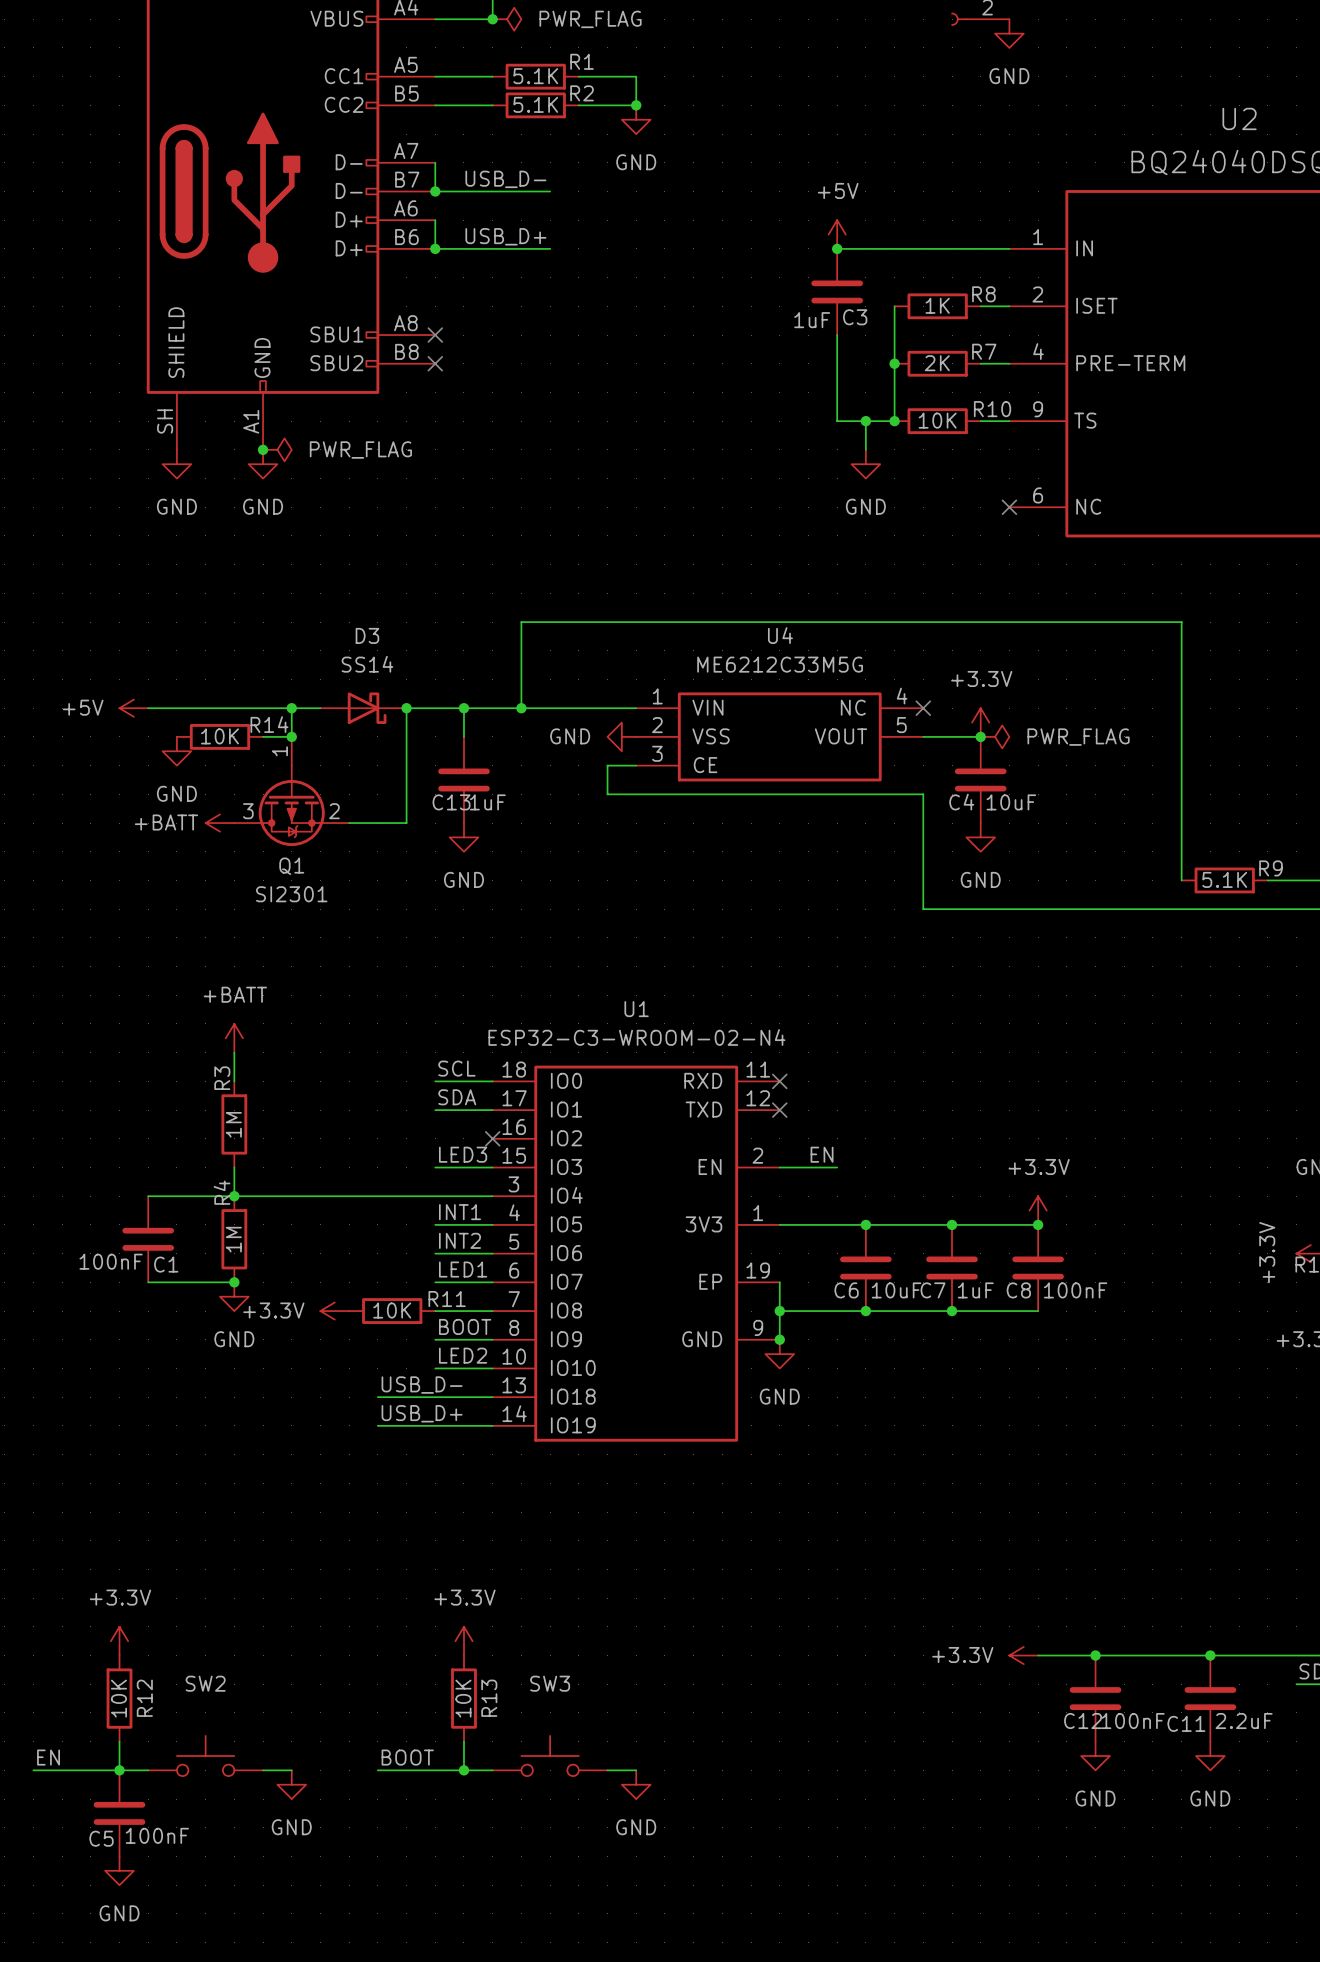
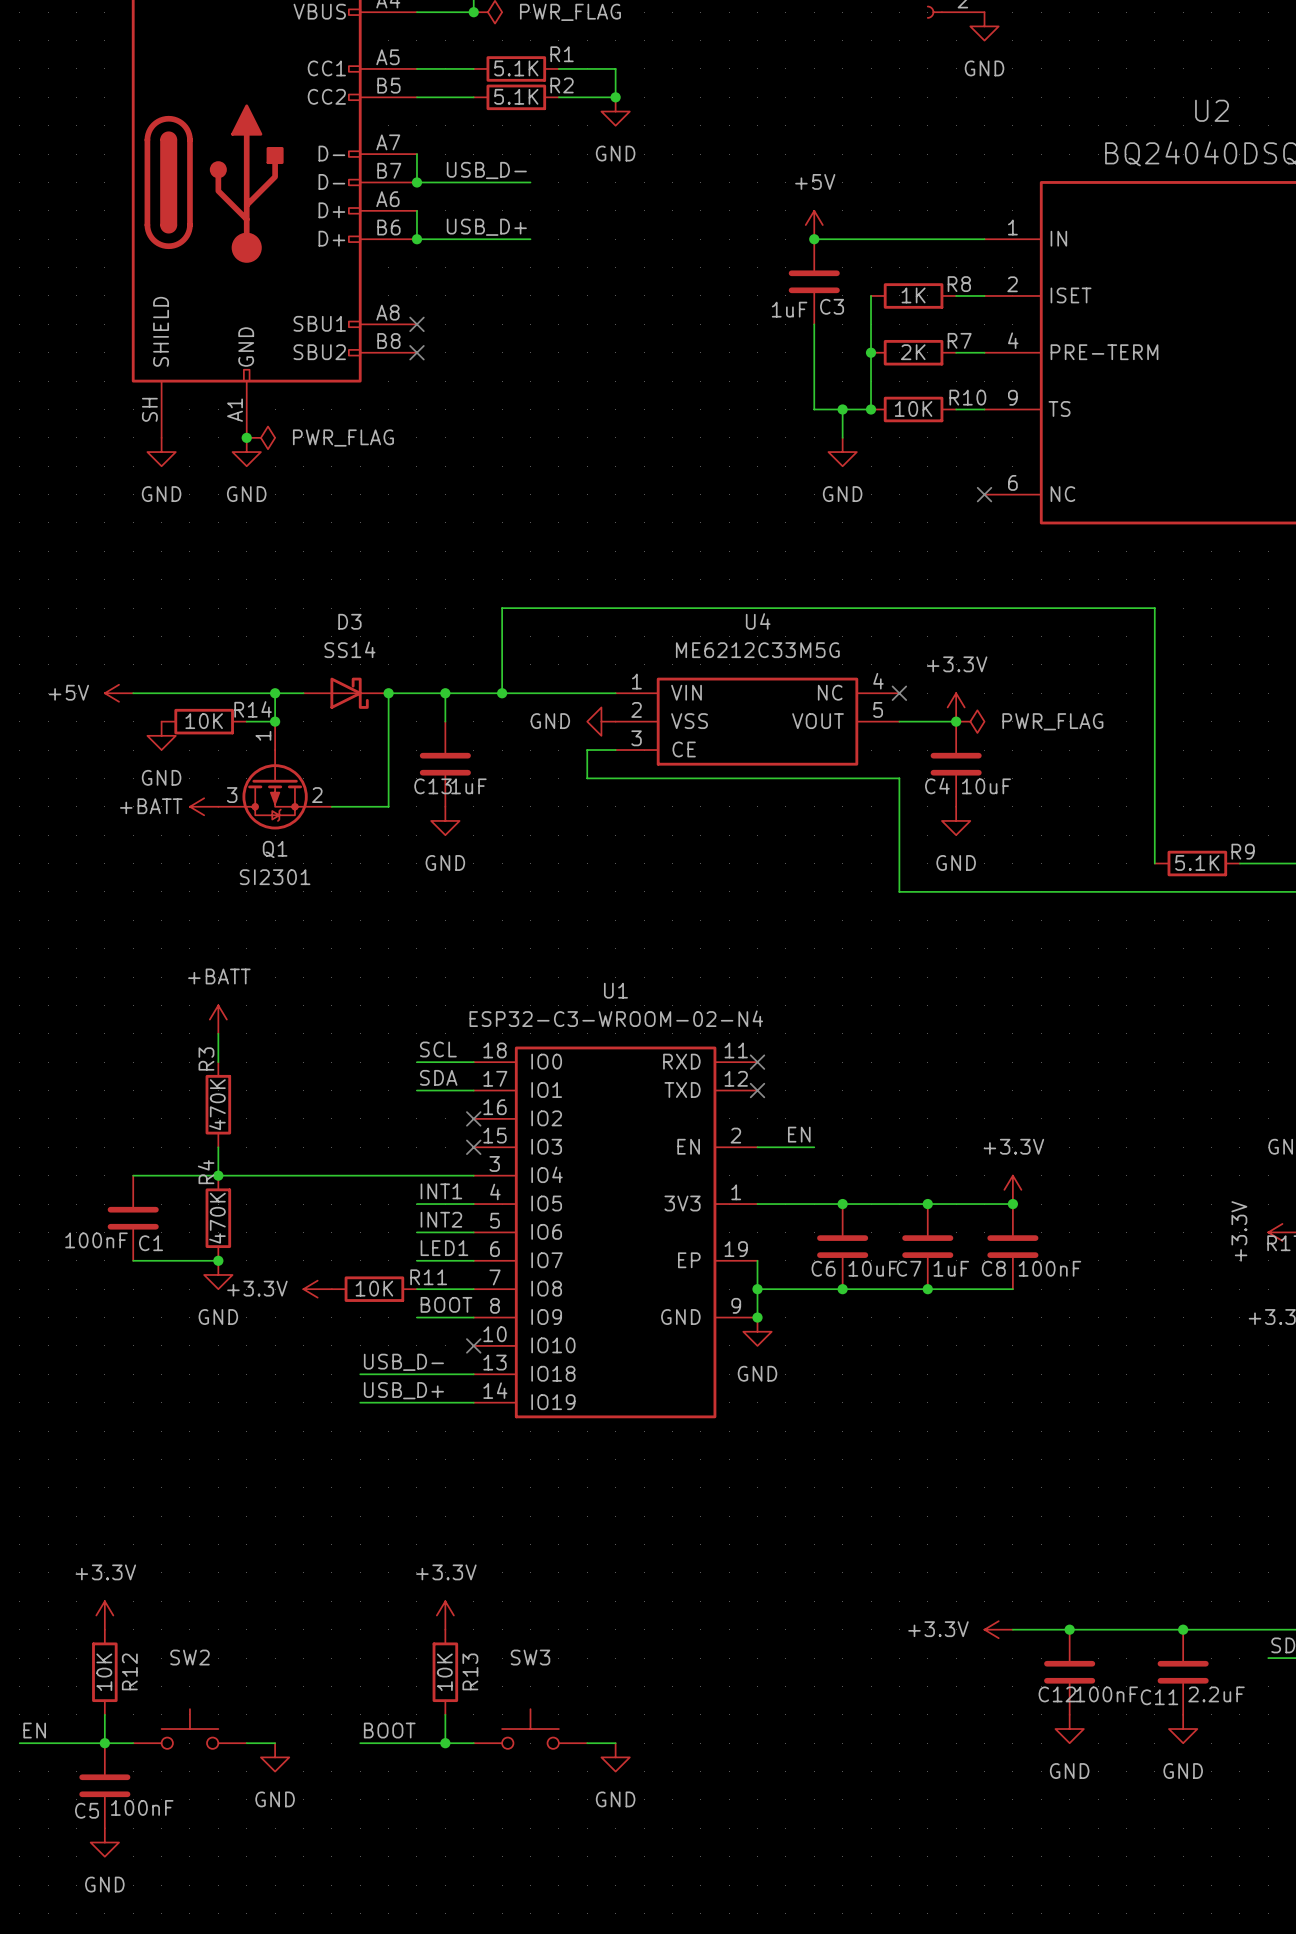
R3 value: 1M (233, 1124) -> 470K (217, 1104)
label: LED3 (463, 1154) -> none
wire: (435, 1167) (492, 1167) -> none
no-connect mark: none -> (473, 1147)
R4 value: 1M (233, 1239) -> 470K (217, 1218)
label: LED2 (463, 1355) -> none
wire: (435, 1368) (492, 1368) -> none
no-connect mark: none -> (473, 1345)

